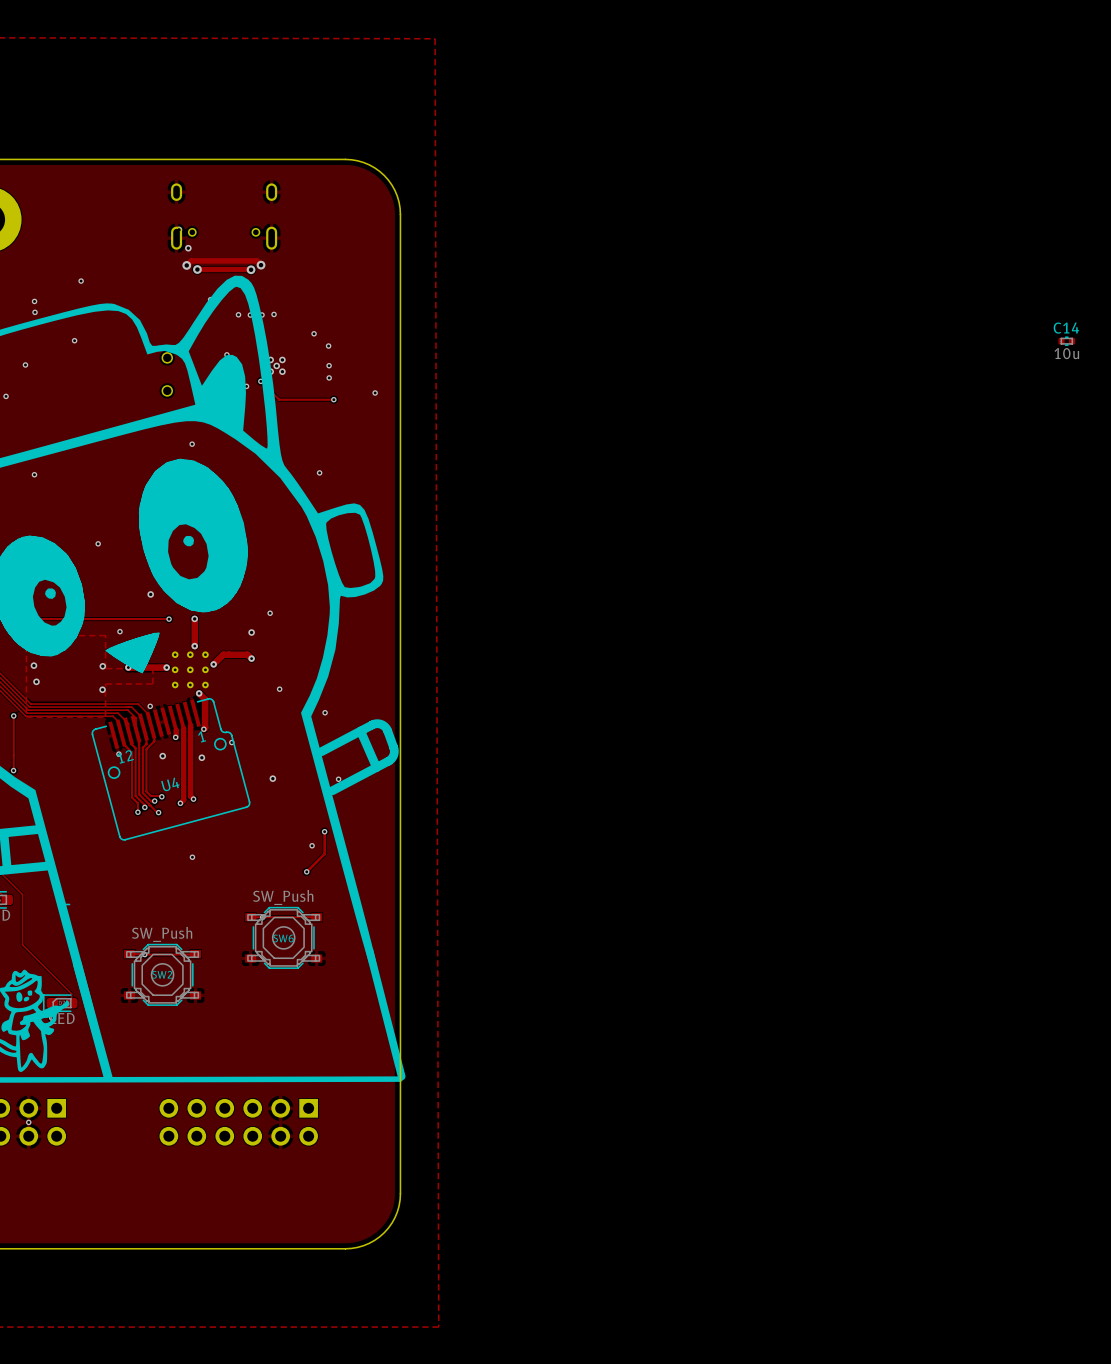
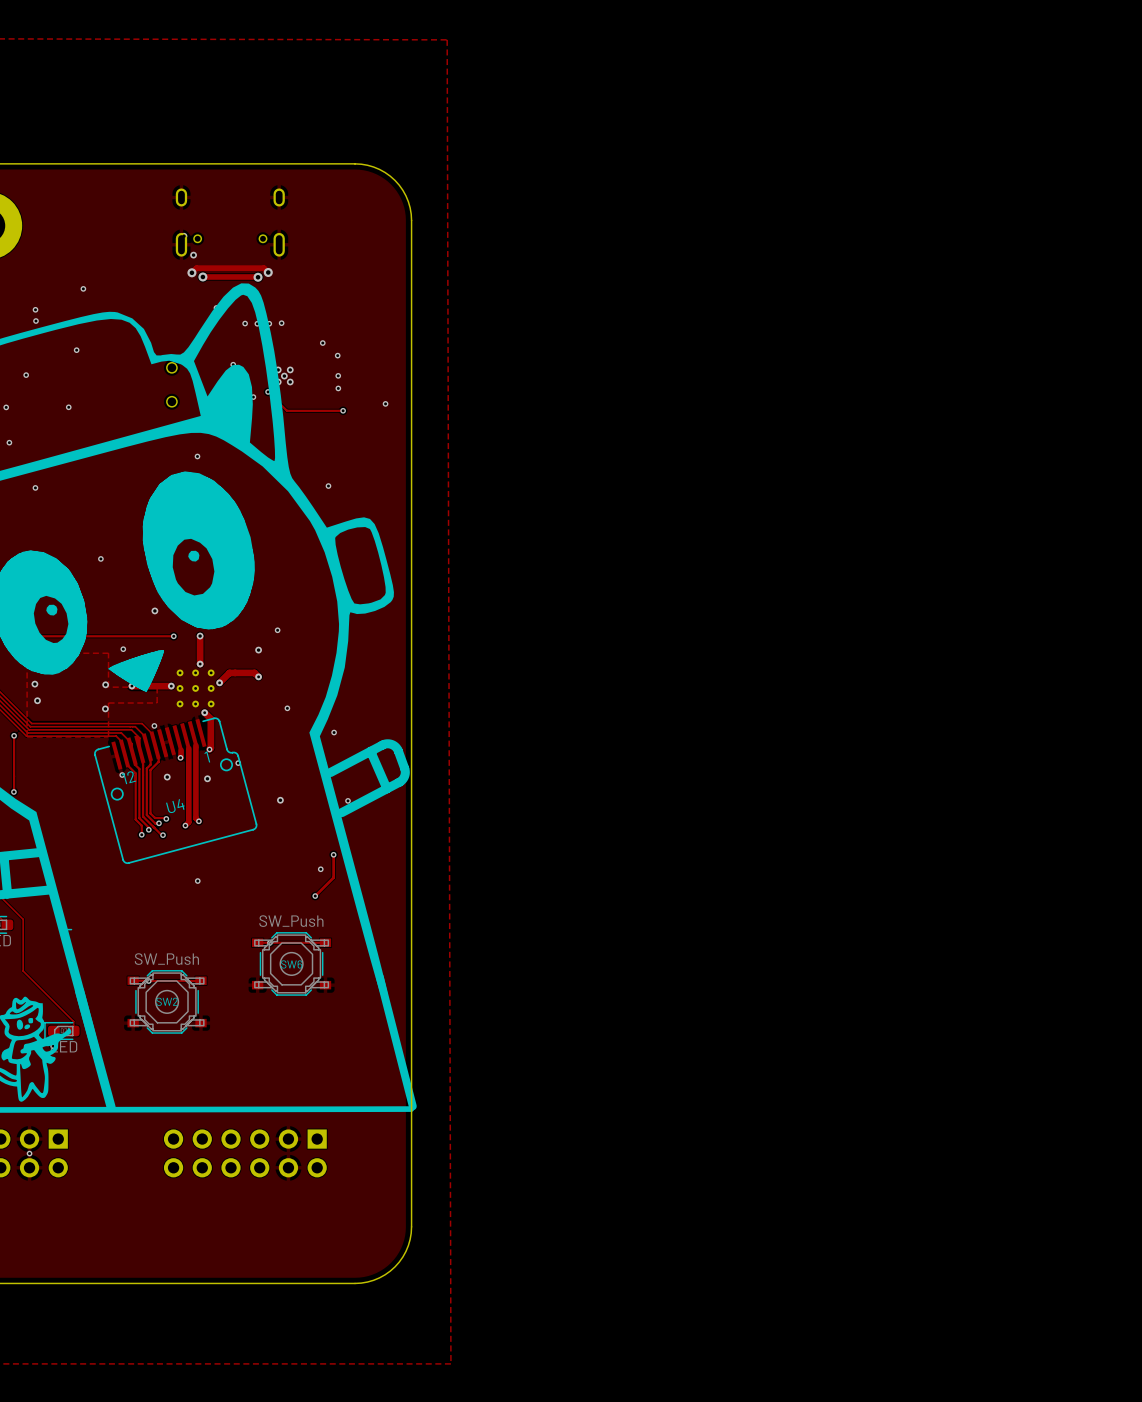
C14: 10u (1066, 341) -> none
via: none -> (68, 407)
via: none -> (9, 442)

